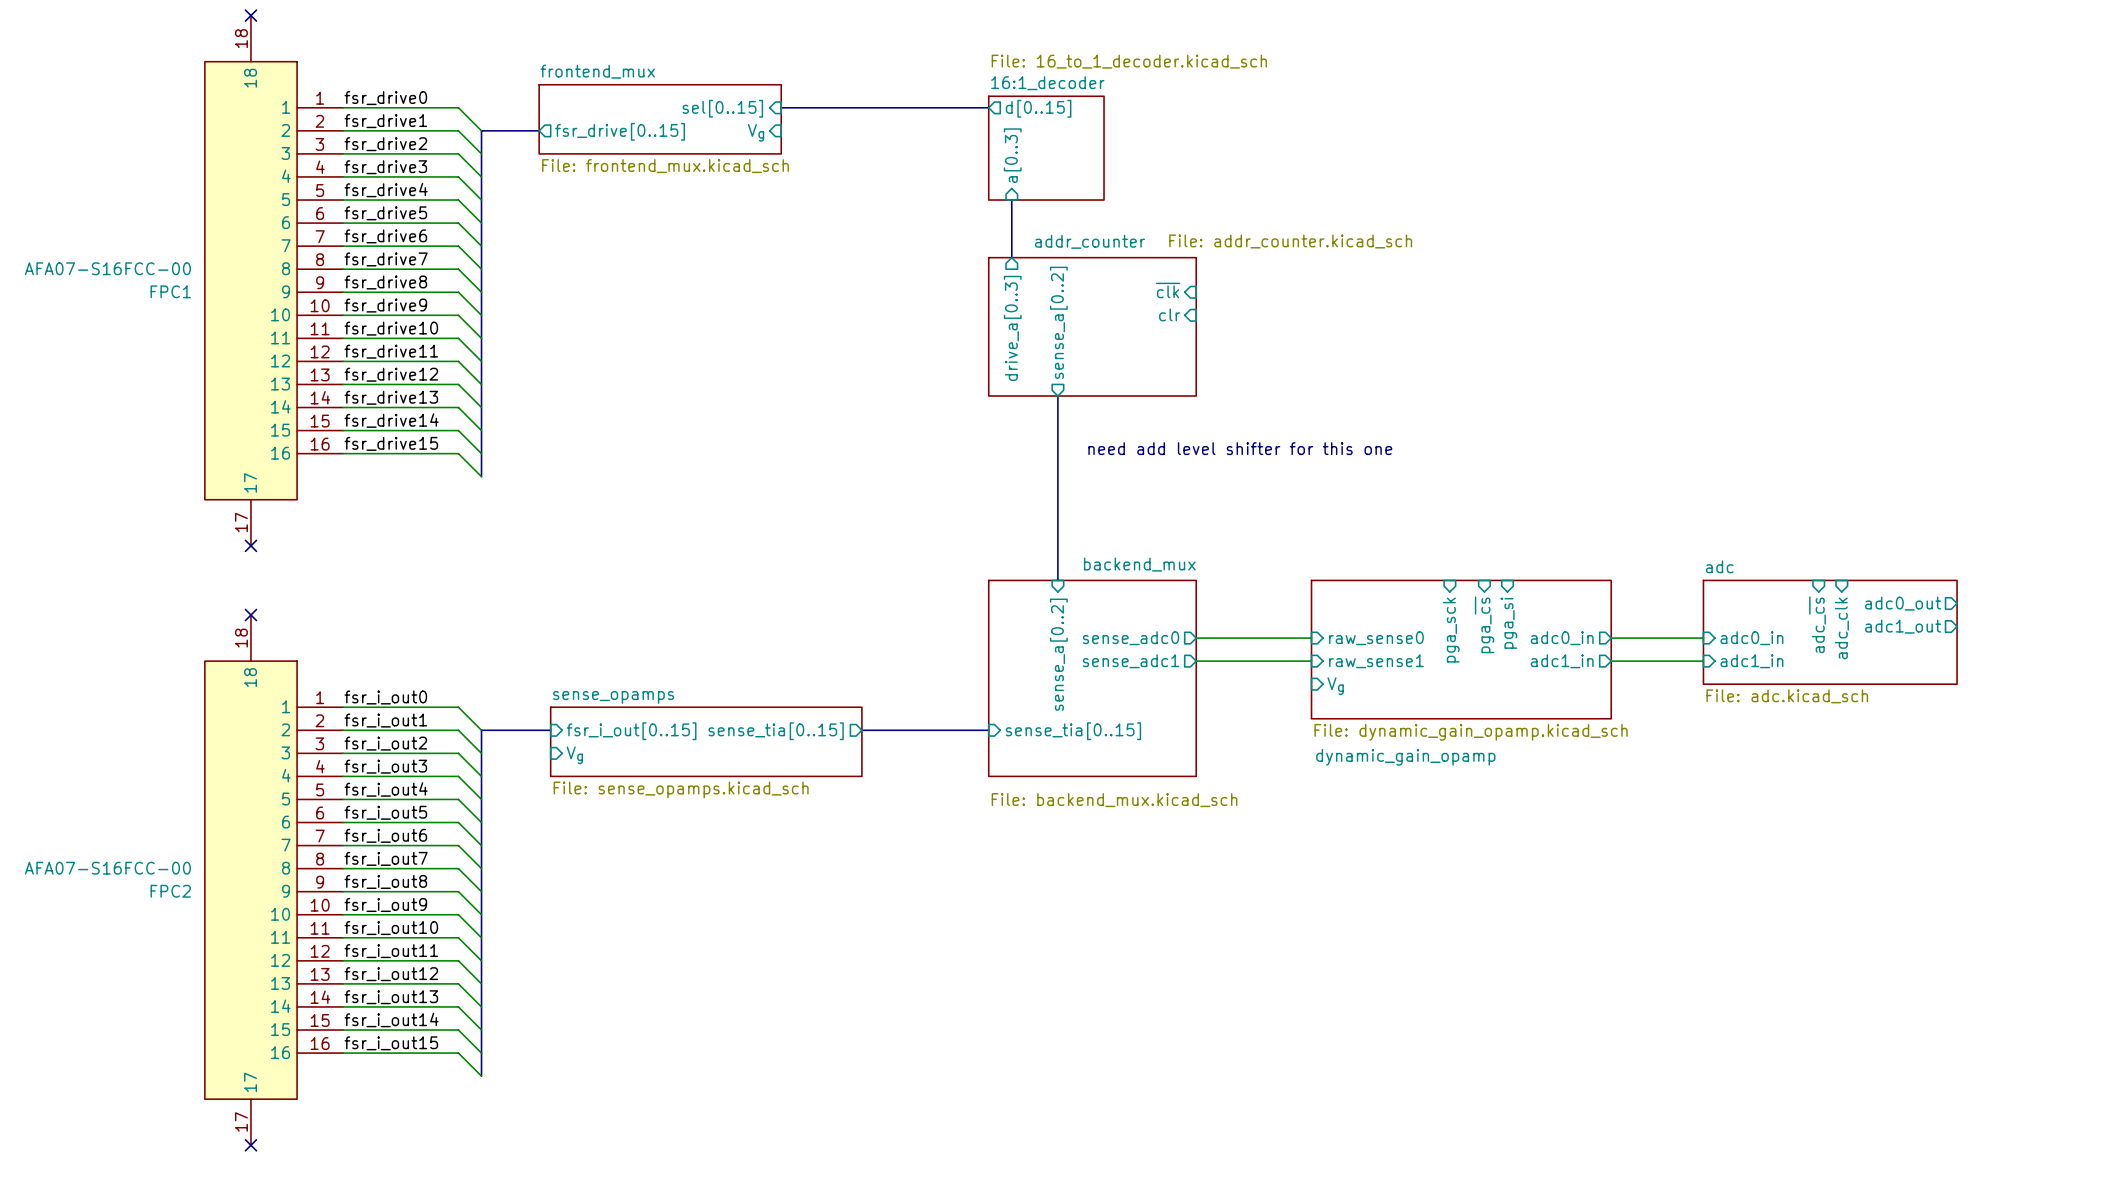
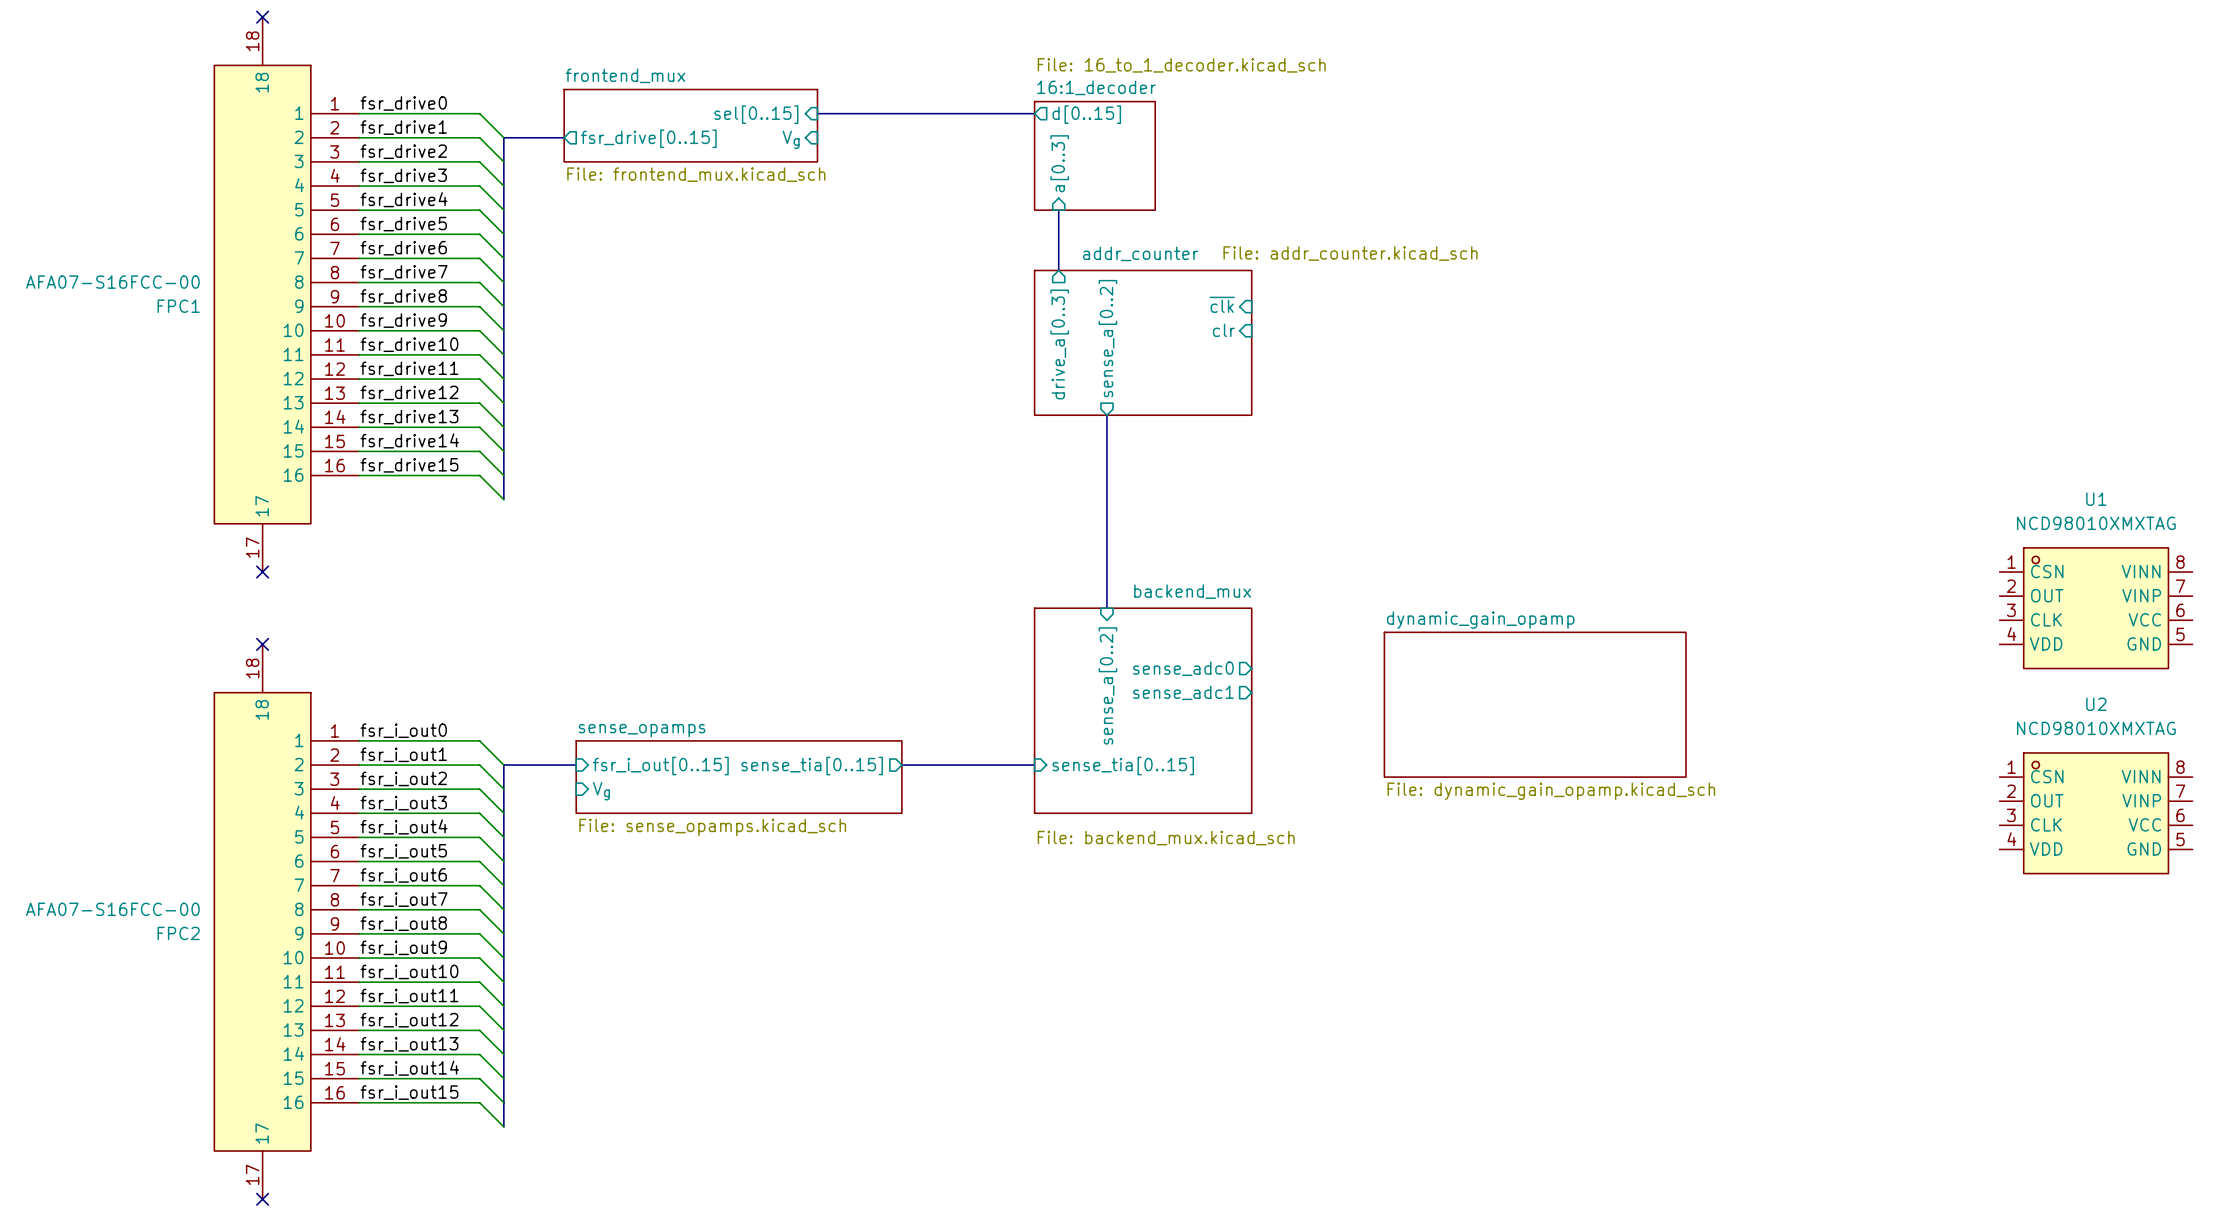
text: need add level shifter for this one (1240, 448) -> none
U1: none -> NCD98010XMXTAG (2096, 608)
sheet pin: adc0_out (1903, 603) -> none
sheet pin: pga_si (1508, 623) -> none
sheet pin: pga_~{cs} (1484, 624) -> none
sheet pin: adc_~{cs} (1817, 624) -> none
sheet pin: adc1_out (1903, 626) -> none
sheet pin: adc_clk (1841, 628) -> none
sheet pin: pga_sck (1451, 630) -> none
sheet adc: File: adc.kicad_sch (1830, 632) -> none
wire: (1196, 638) (1311, 638) -> none
sheet pin: raw_sense0 (1376, 638) -> none
sheet pin: adc0_in (1562, 638) -> none
wire: (1611, 638) (1703, 638) -> none
sheet pin: adc0_in (1751, 638) -> none
sheet dynamic_gain_opamp: File: dynamic_gain_opamp.kicad_sch (1461, 649) -> none
wire: (1196, 661) (1311, 661) -> none
sheet pin: raw_sense1 (1376, 661) -> none
sheet pin: adc1_in (1562, 661) -> none
wire: (1611, 661) (1703, 661) -> none
sheet pin: adc1_in (1751, 661) -> none
sheet dynamic_gain_opamp: none -> File: dynamic_gain_opamp.kicad_sch (1535, 704)
sheet pin: Vg (1335, 686) -> none
U2: none -> NCD98010XMXTAG (2096, 813)

